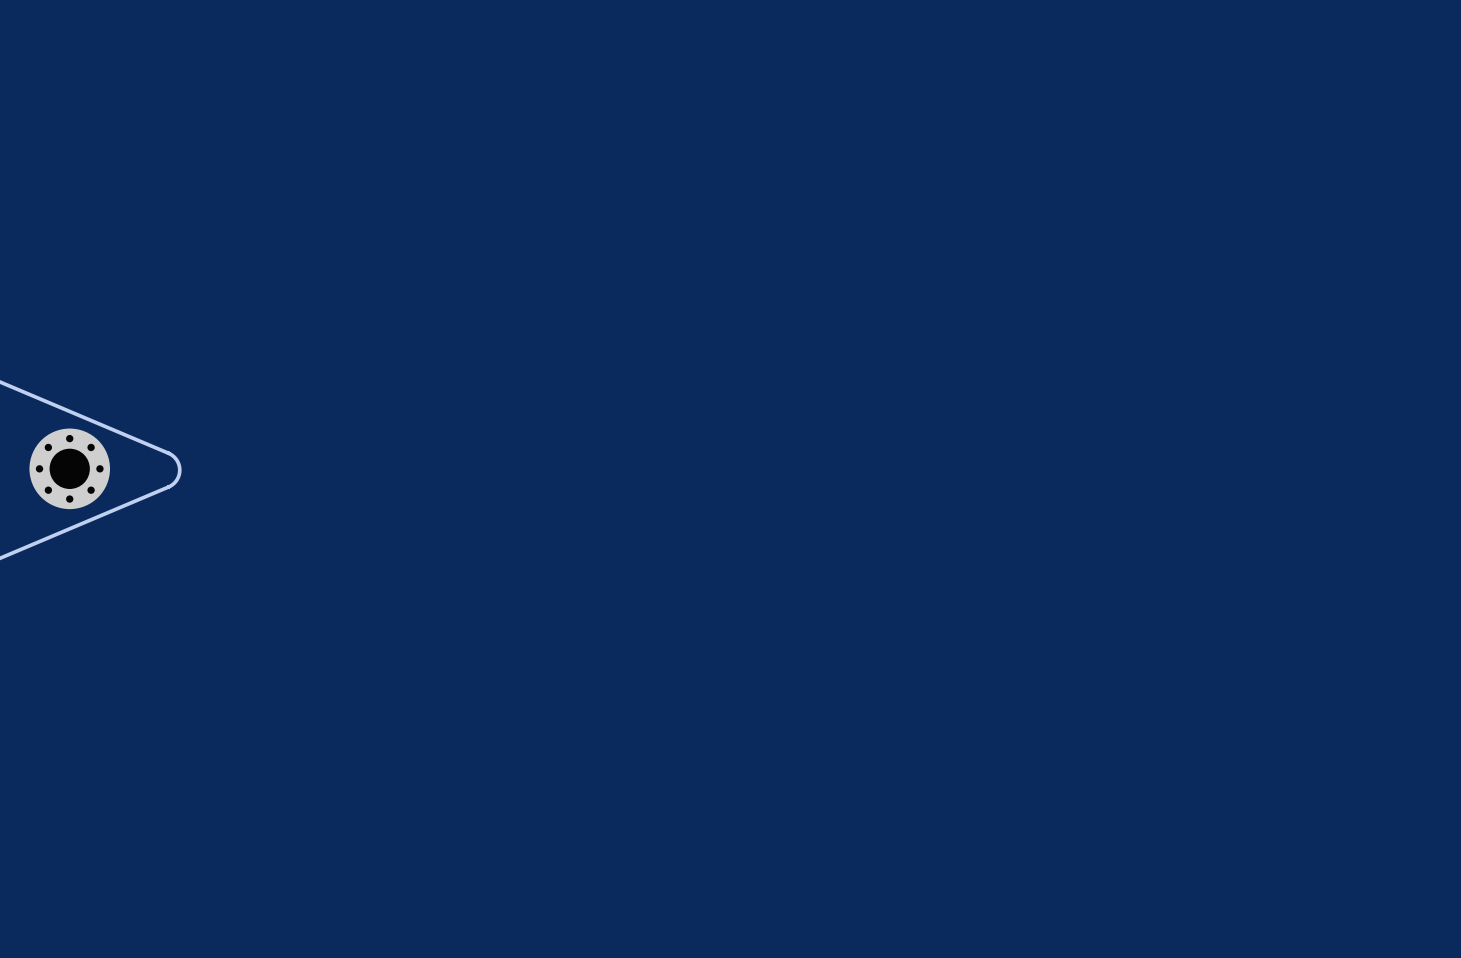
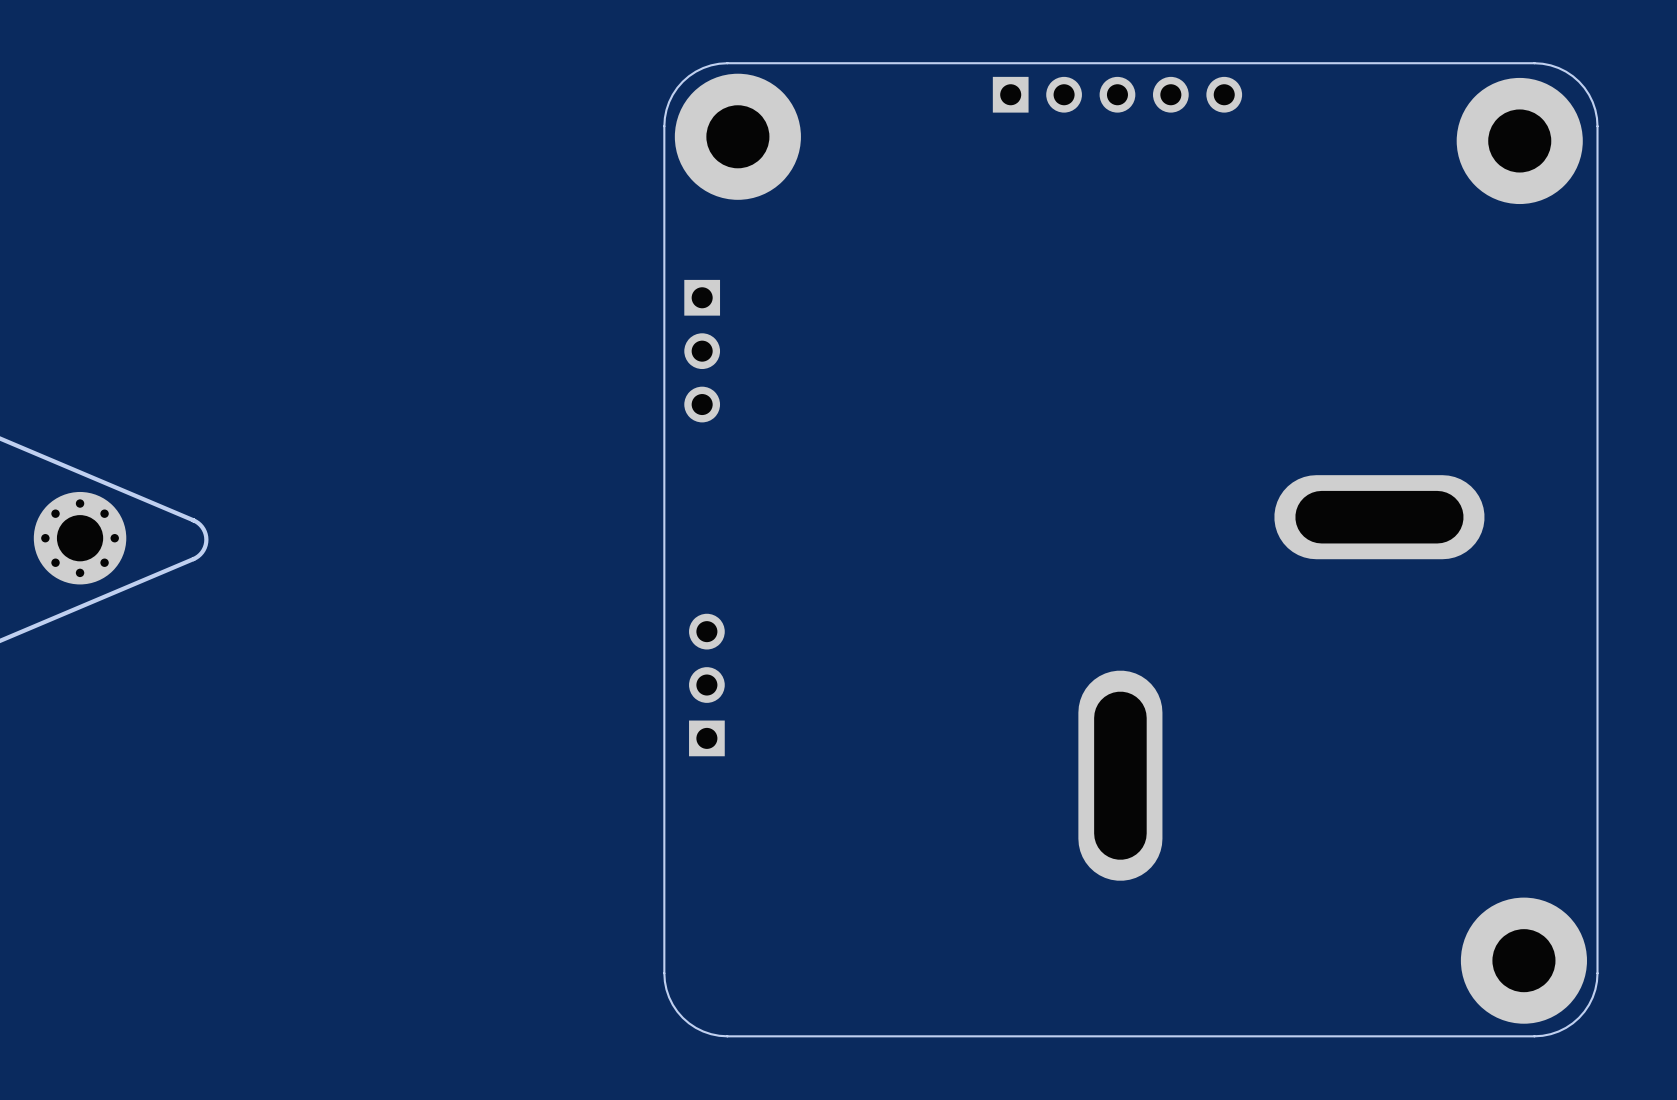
board edge: none -> (1534, 63) (727, 63) (703, 68) (682, 81) (669, 102) (664, 126) (664, 973) (669, 997) (682, 1017) (703, 1031) (727, 1036) (1534, 1036) (1558, 1031) (1579, 1017) (1592, 997) (1597, 973) (1597, 126) (1592, 102) (1579, 81) (1558, 68) (1534, 63)
part: none -> (1117, 94)
part: none -> (737, 136)
part: none -> (1519, 140)
part: none -> (702, 351)
part: none -> (1379, 517)
part: none -> (706, 685)
part: none -> (1120, 775)
part: none -> (1523, 960)

